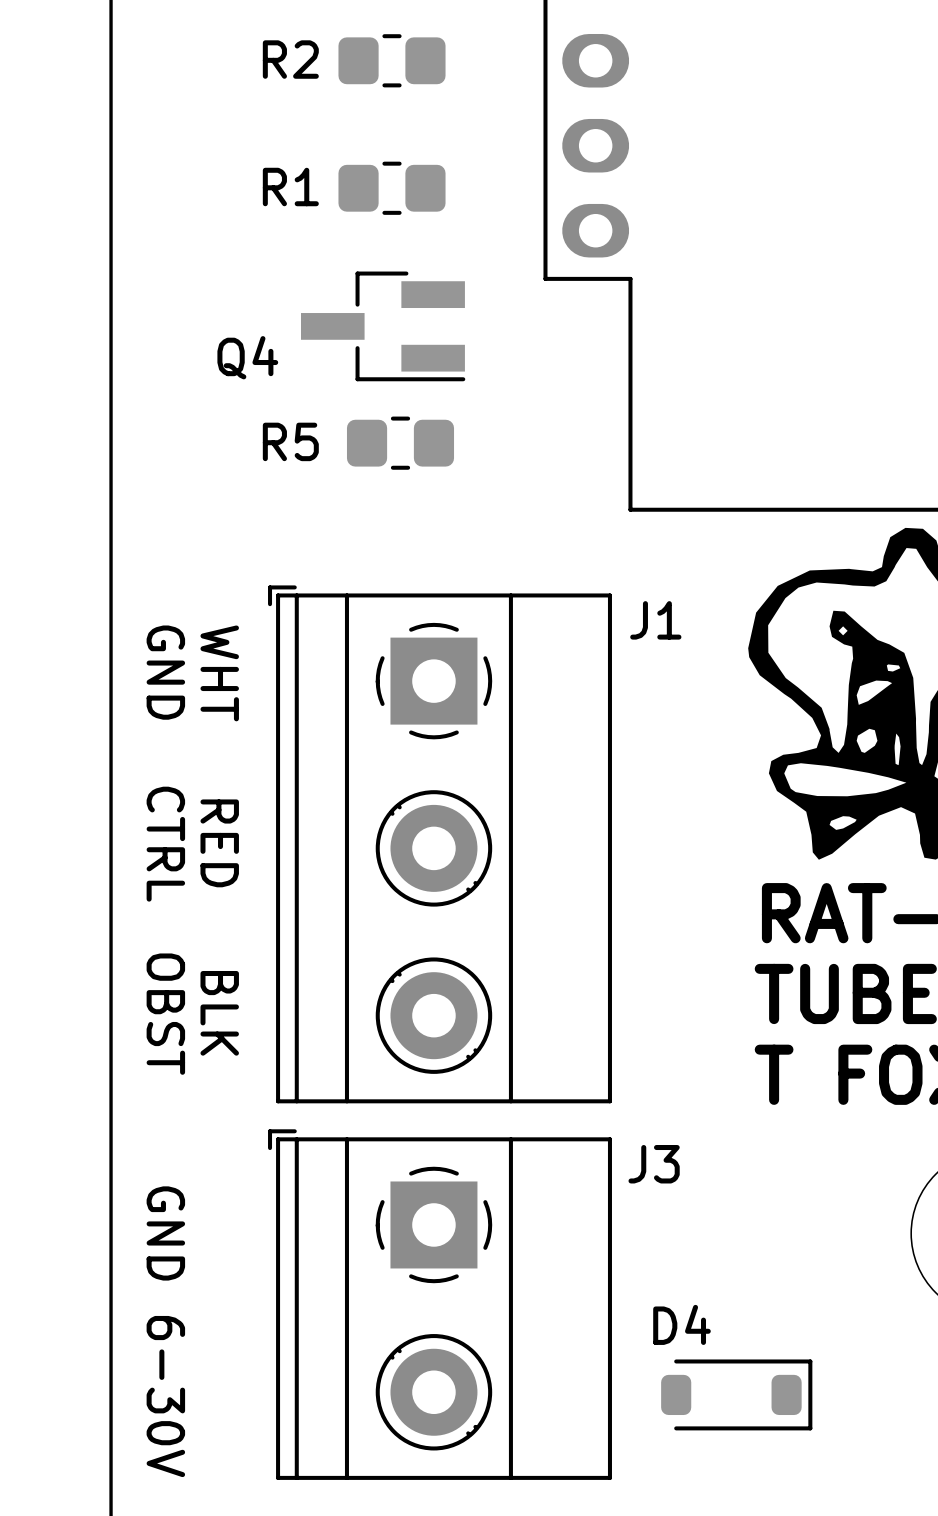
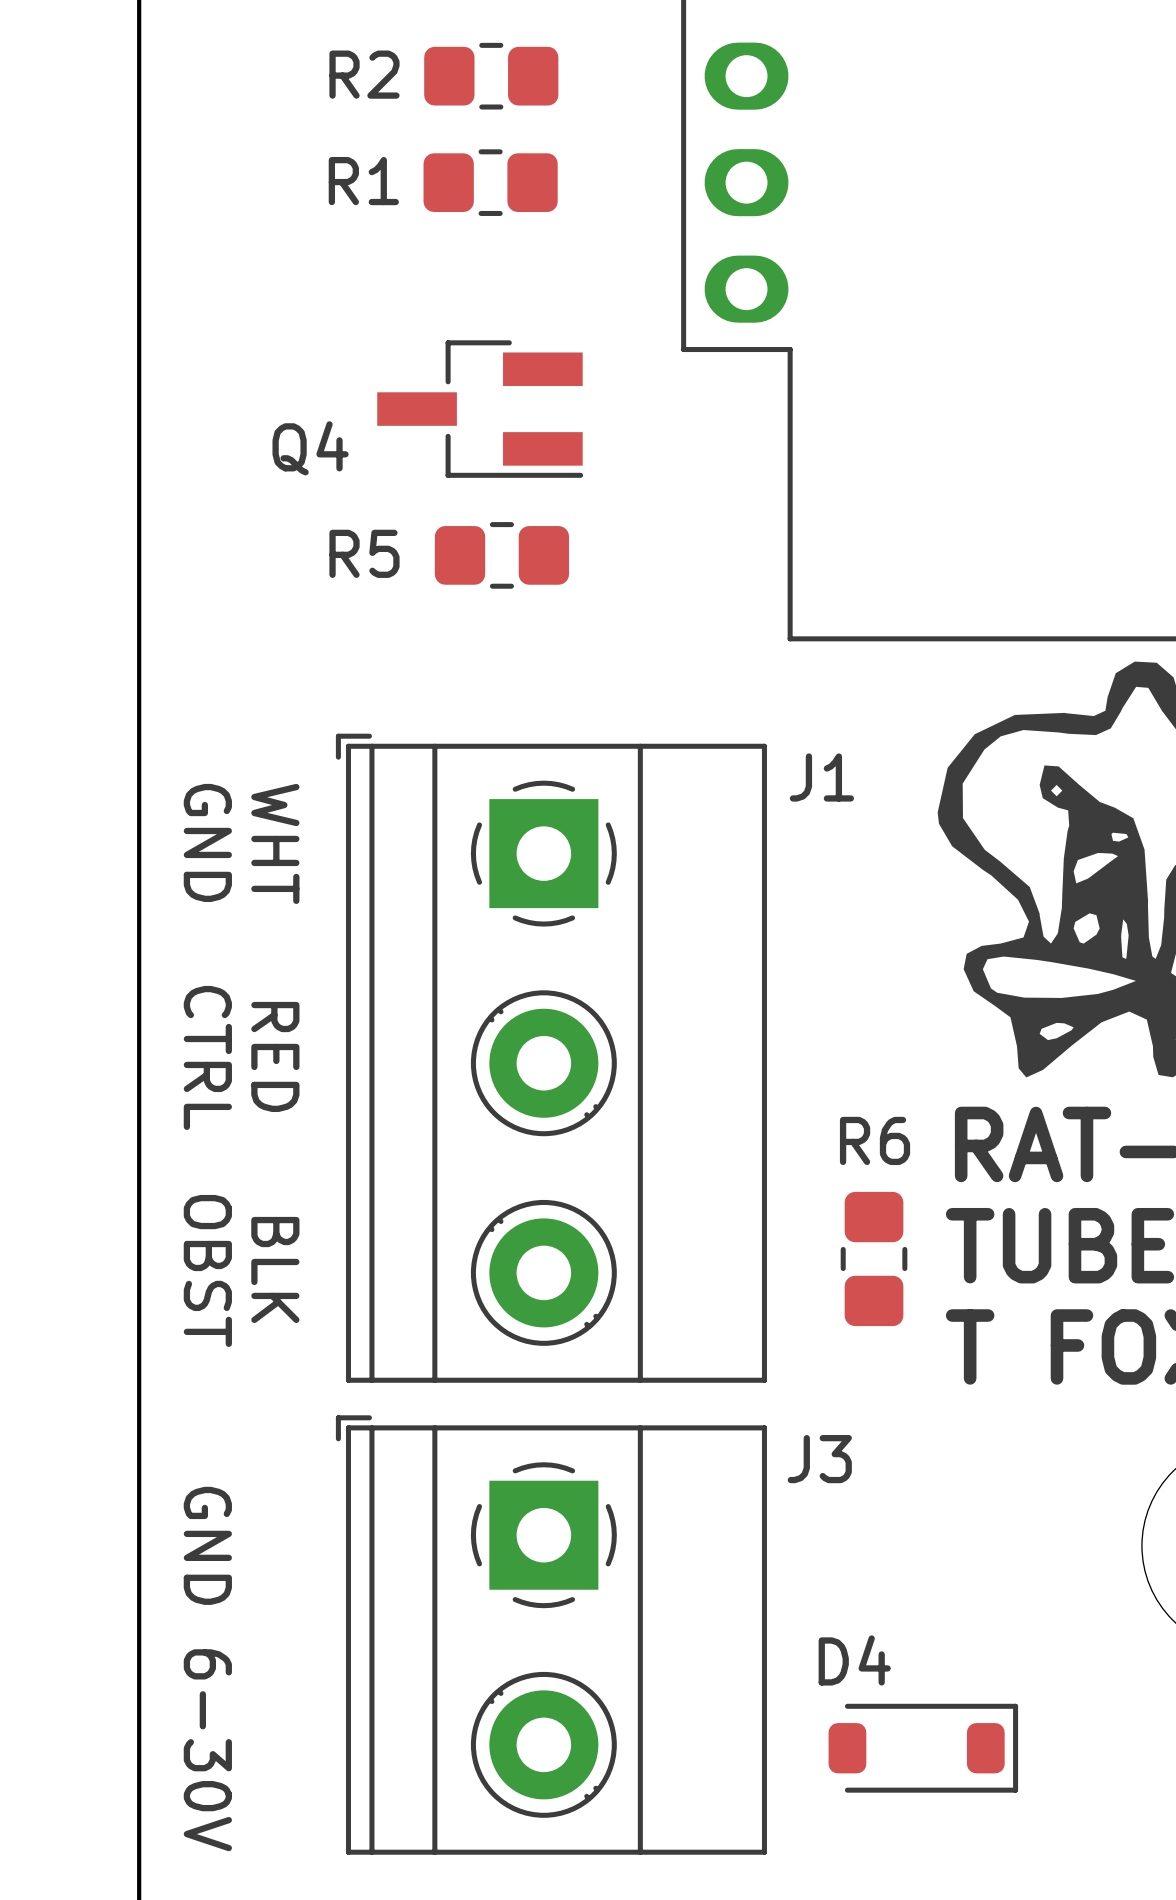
R1 position: (392, 188) -> (490, 182)
R6: none -> (874, 1258)

